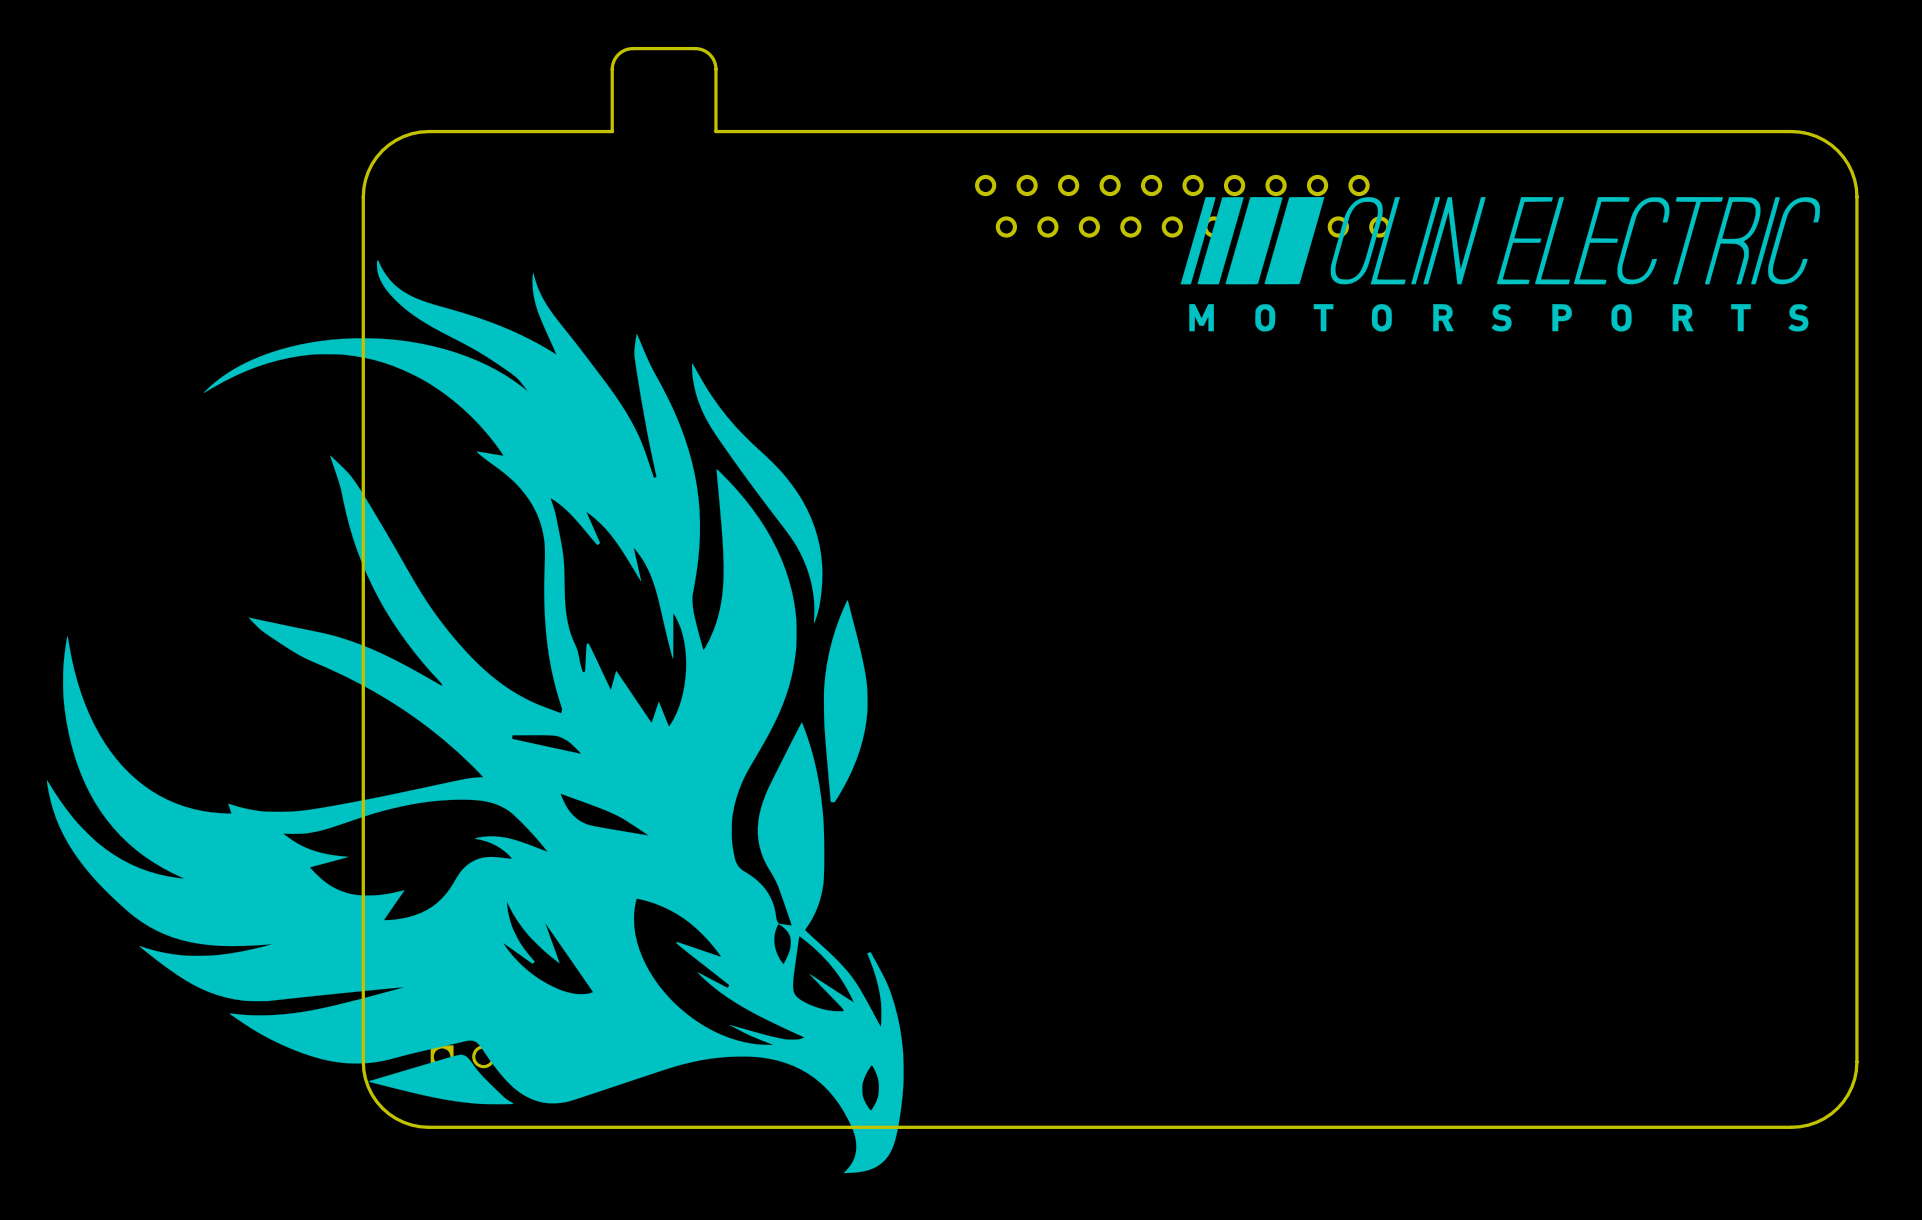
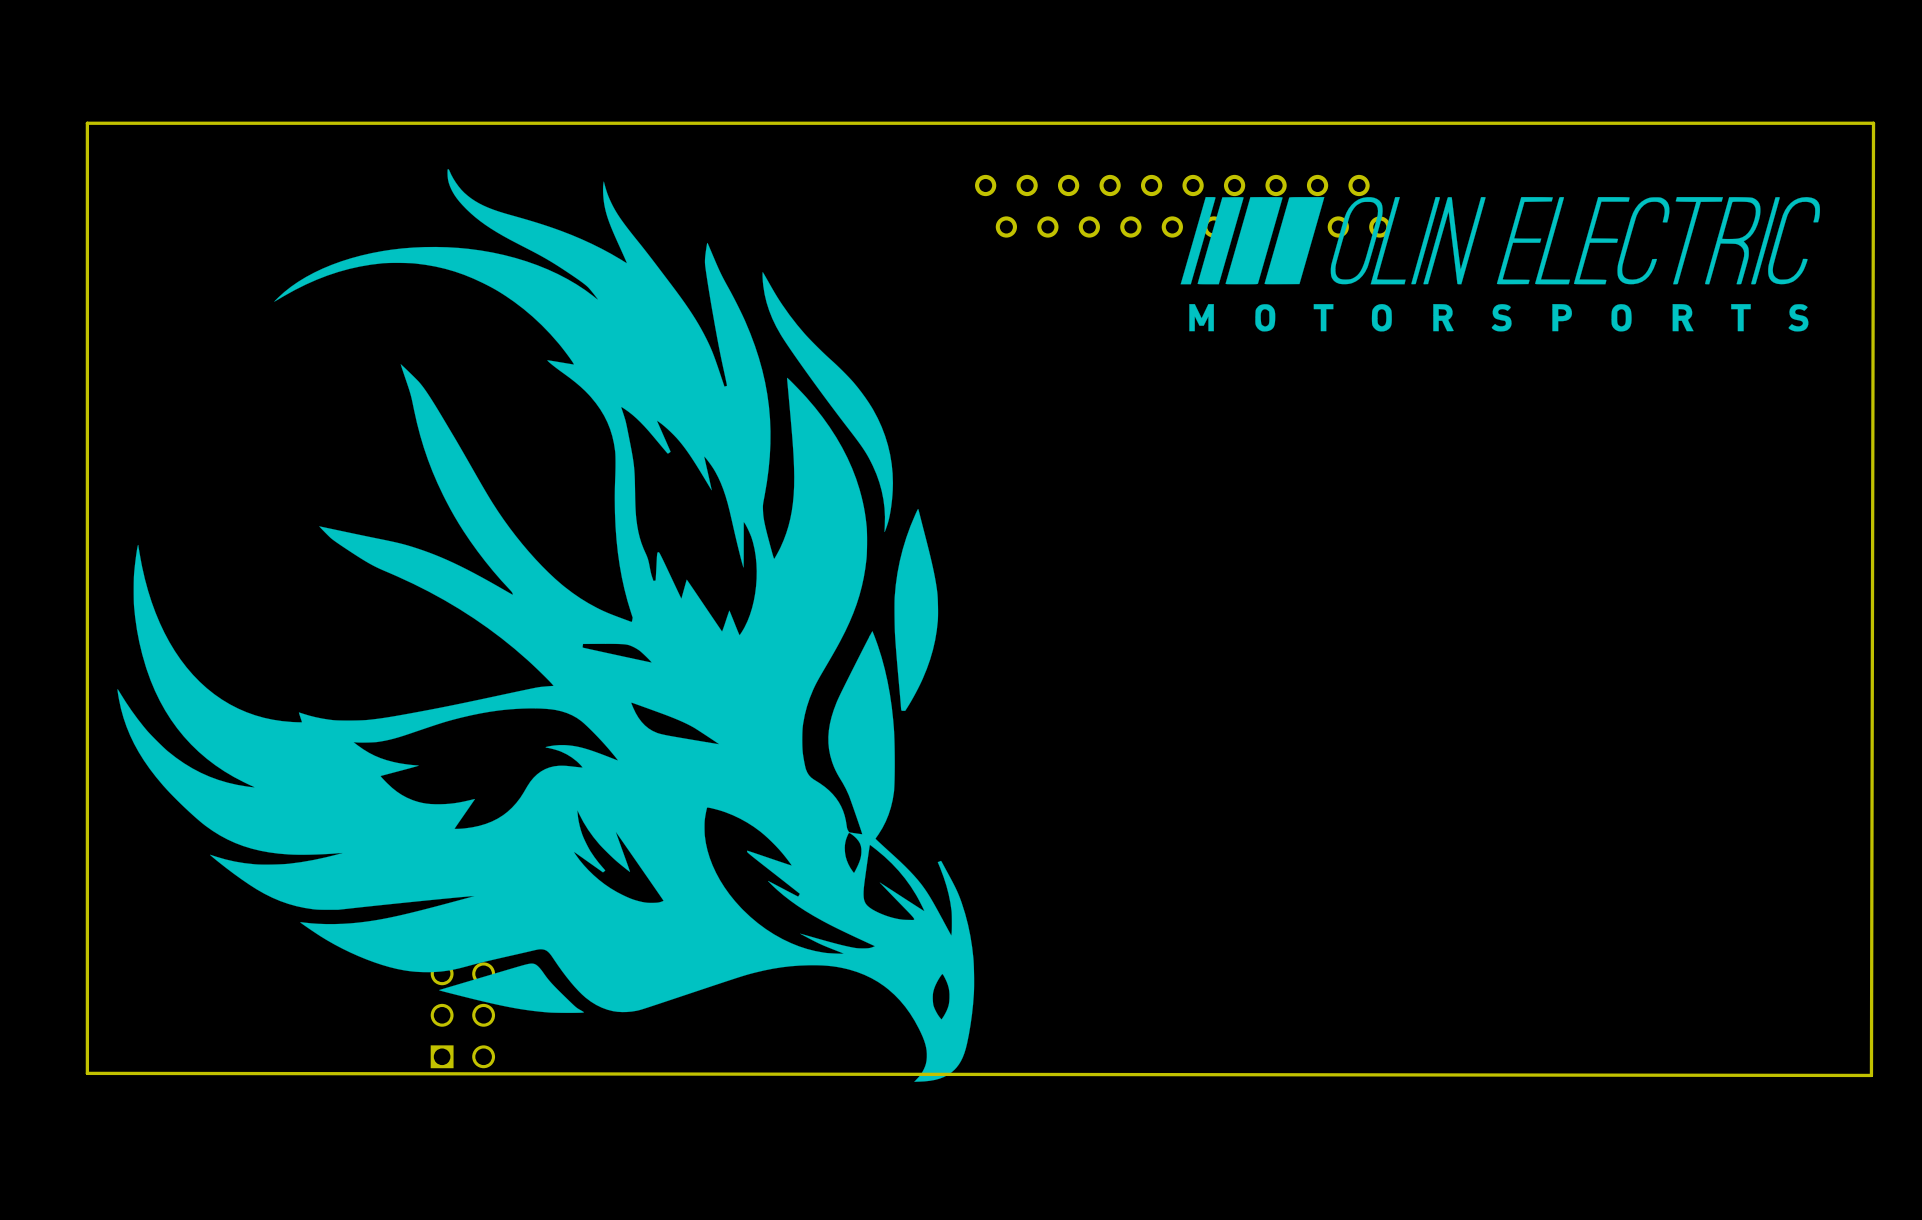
board edge: (695, 48) (630, 48) (618, 54) (612, 66) (612, 131) (420, 132) (403, 136) (388, 145) (372, 164) (365, 179) (363, 196) (363, 1061) (368, 1086) (382, 1108) (403, 1122) (428, 1127) (1791, 1127) (1816, 1122) (1837, 1108) (1851, 1086) (1856, 1061) (1856, 196) (1851, 171) (1837, 150) (1816, 136) (1791, 131) (715, 131) (715, 63) (707, 52) (695, 48) -> (1873, 123) (1871, 1075) (87, 1073) (87, 123) (1873, 123)
drawing position: (475, 716) -> (545, 625)

